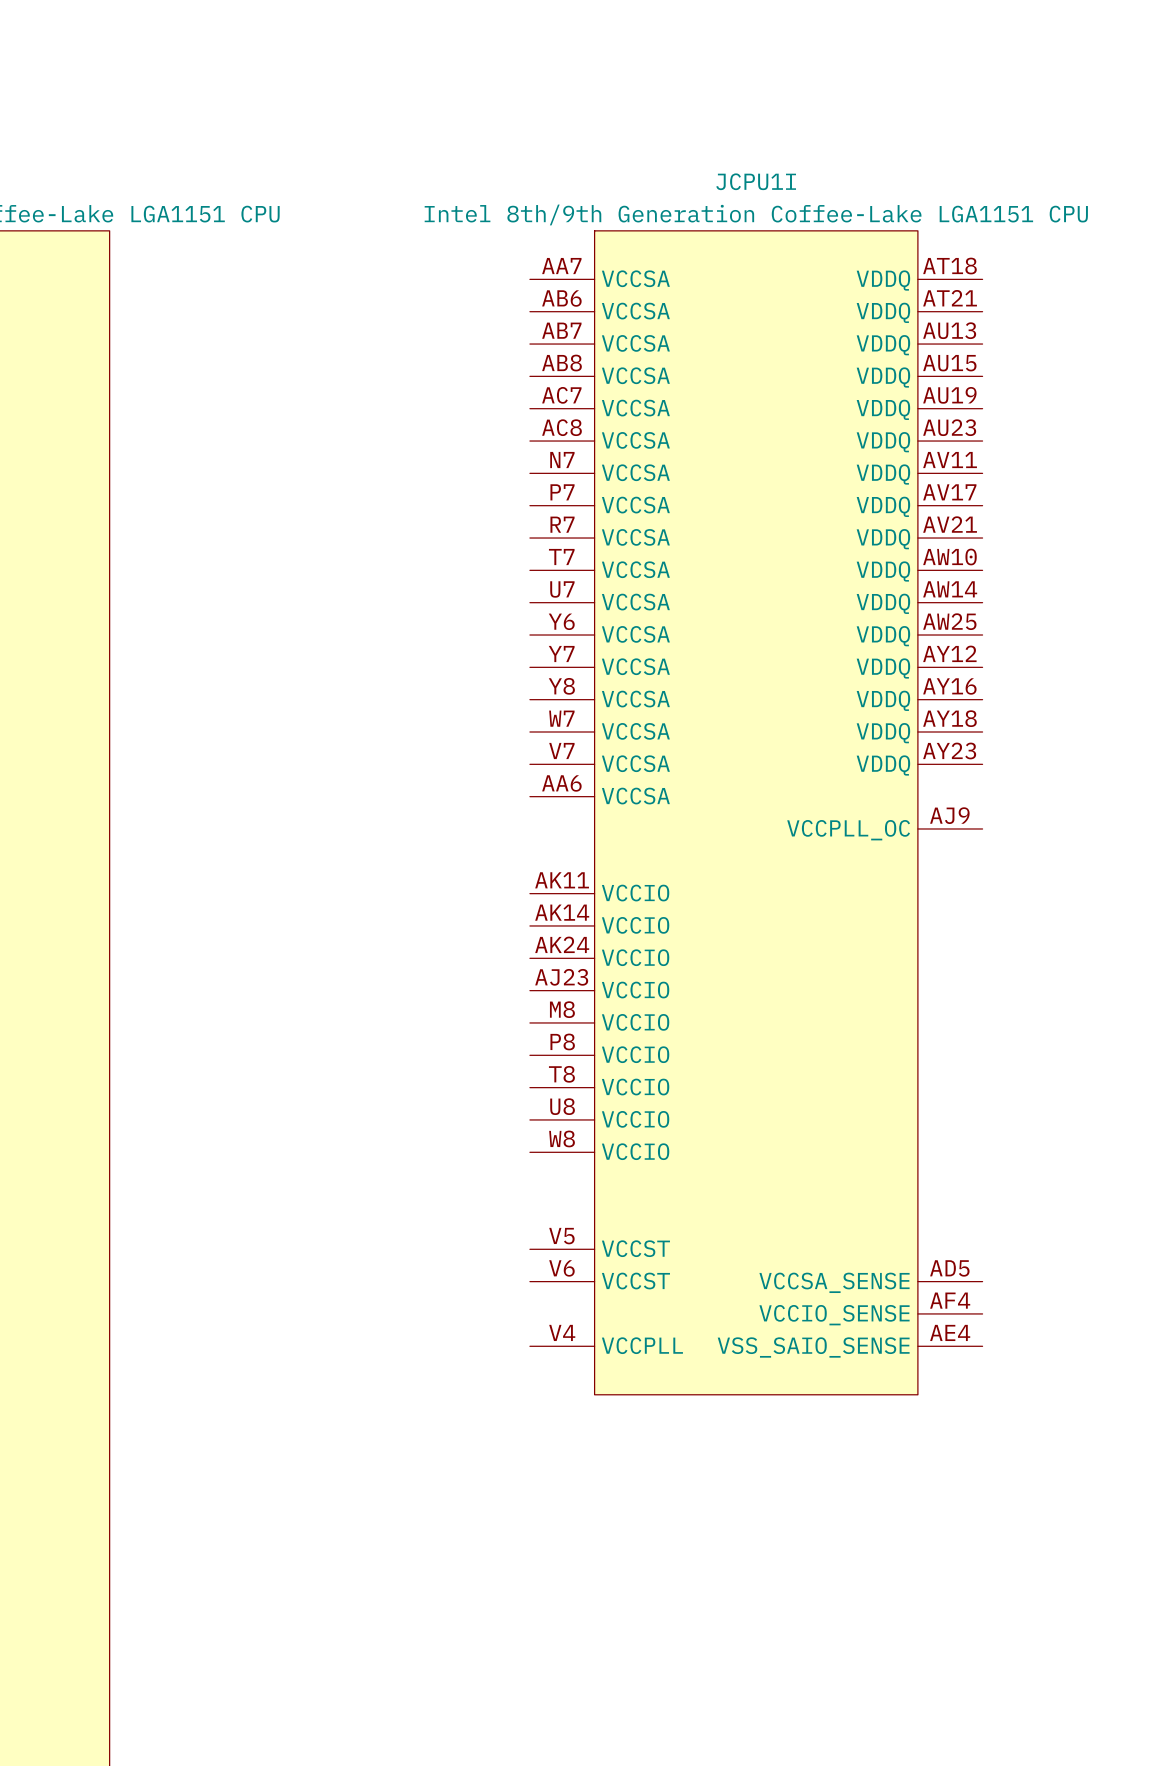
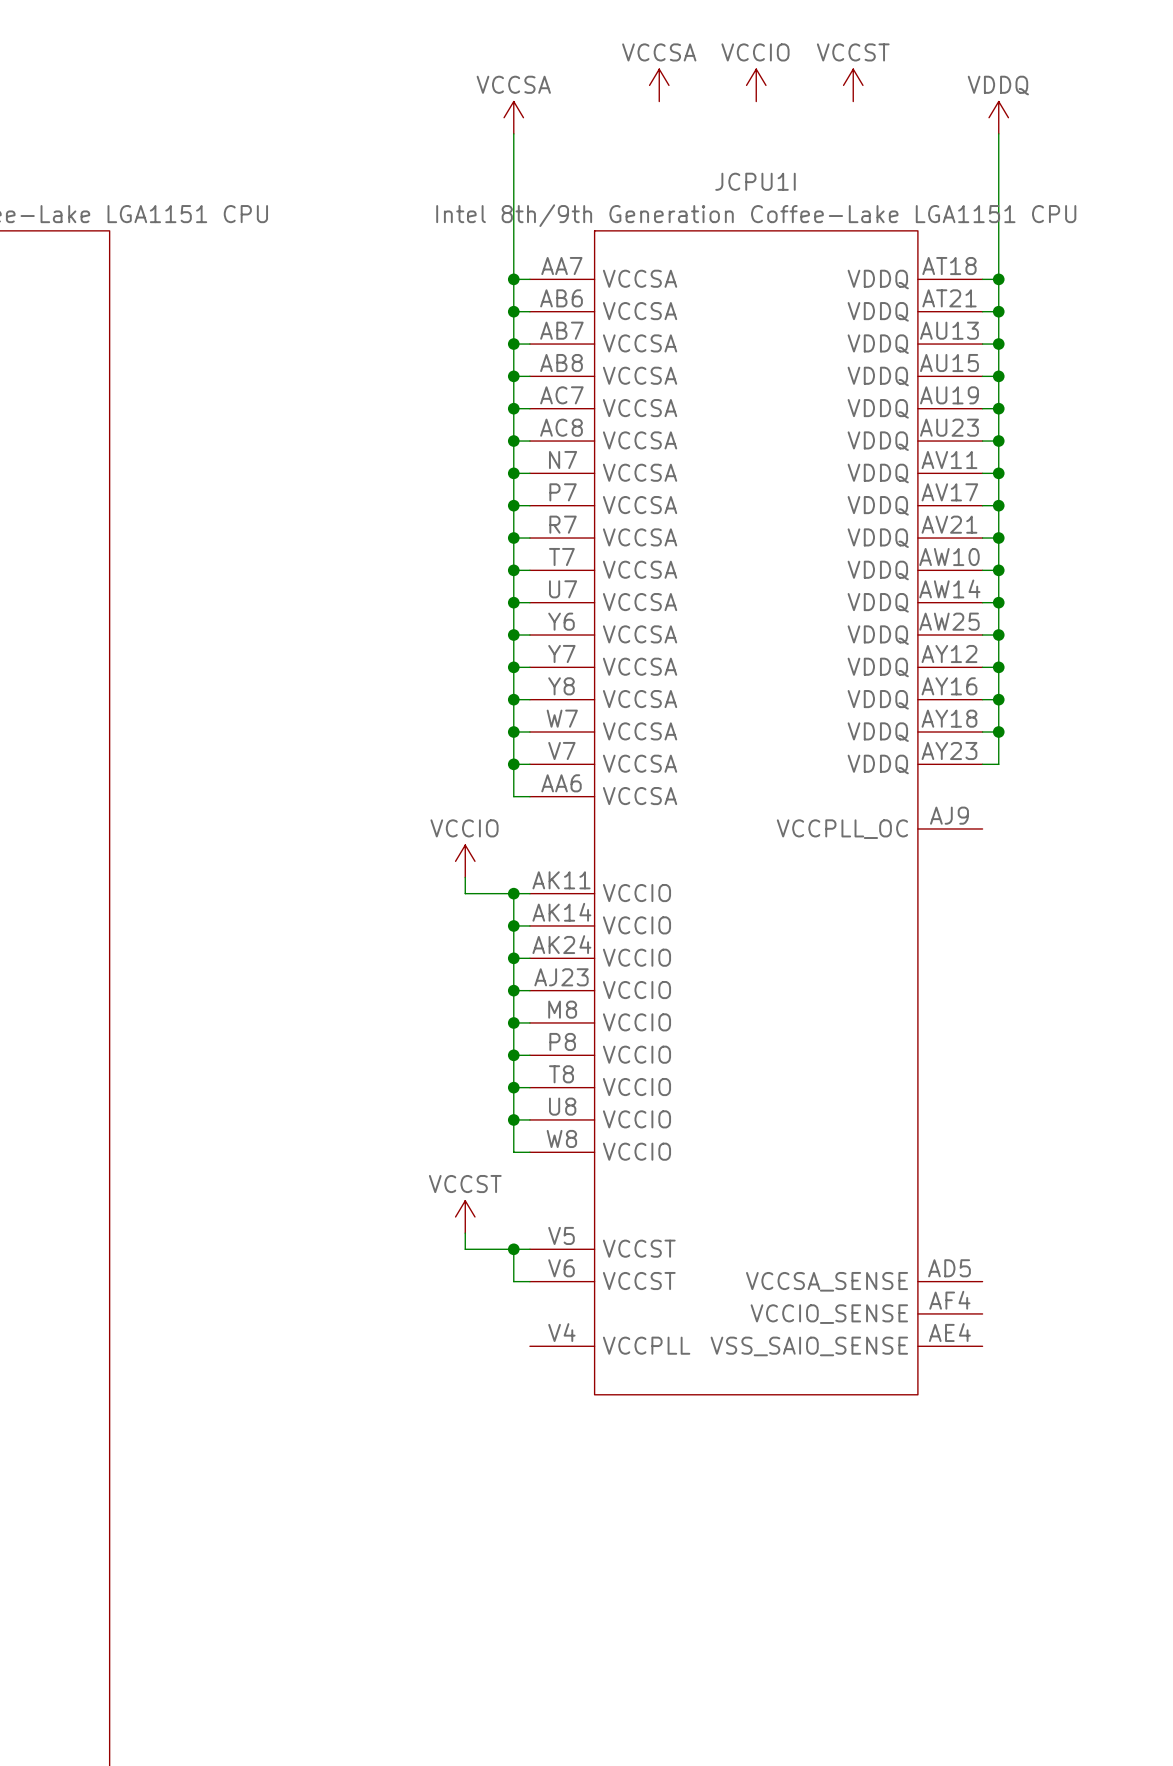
power symbol: none -> VCCSA (659, 85)
power symbol: none -> VCCIO (756, 85)
power symbol: none -> VCCST (853, 85)
power symbol: none -> VCCSA (513, 117)
power symbol: none -> VDDQ (998, 117)
wire: none -> (513, 133) (513, 796) (529, 796)
wire: none -> (998, 133) (998, 764) (982, 764)
wire: none -> (513, 279) (529, 279)
junction: none -> (513, 279)
wire: none -> (982, 279) (998, 279)
junction: none -> (998, 279)
wire: none -> (513, 311) (529, 311)
junction: none -> (513, 311)
wire: none -> (982, 311) (998, 311)
junction: none -> (998, 311)
wire: none -> (513, 344) (529, 344)
junction: none -> (513, 344)
wire: none -> (982, 344) (998, 344)
junction: none -> (998, 344)
wire: none -> (513, 376) (529, 376)
junction: none -> (513, 376)
wire: none -> (982, 376) (998, 376)
junction: none -> (998, 376)
wire: none -> (513, 408) (529, 408)
junction: none -> (513, 408)
wire: none -> (982, 408) (998, 408)
junction: none -> (998, 408)
wire: none -> (513, 441) (529, 441)
junction: none -> (513, 441)
wire: none -> (982, 441) (998, 441)
junction: none -> (998, 441)
wire: none -> (513, 473) (529, 473)
junction: none -> (513, 473)
wire: none -> (982, 473) (998, 473)
junction: none -> (998, 473)
wire: none -> (513, 505) (529, 505)
junction: none -> (513, 505)
wire: none -> (982, 505) (998, 505)
junction: none -> (998, 505)
wire: none -> (513, 538) (529, 538)
junction: none -> (513, 538)
wire: none -> (982, 538) (998, 538)
junction: none -> (998, 538)
wire: none -> (513, 570) (529, 570)
junction: none -> (513, 570)
wire: none -> (982, 570) (998, 570)
junction: none -> (998, 570)
wire: none -> (513, 602) (529, 602)
junction: none -> (513, 602)
wire: none -> (982, 602) (998, 602)
junction: none -> (998, 602)
wire: none -> (513, 635) (529, 635)
junction: none -> (513, 635)
wire: none -> (982, 635) (998, 635)
junction: none -> (998, 635)
wire: none -> (513, 667) (529, 667)
junction: none -> (513, 667)
wire: none -> (982, 667) (998, 667)
junction: none -> (998, 667)
wire: none -> (513, 699) (529, 699)
junction: none -> (513, 699)
wire: none -> (982, 699) (998, 699)
junction: none -> (998, 699)
wire: none -> (513, 731) (529, 731)
junction: none -> (513, 731)
wire: none -> (982, 731) (998, 731)
junction: none -> (998, 731)
wire: none -> (513, 764) (529, 764)
junction: none -> (513, 764)
power symbol: none -> VCCIO (465, 861)
wire: none -> (465, 877) (465, 893) (529, 893)
wire: none -> (513, 893) (513, 1152) (529, 1152)
junction: none -> (513, 893)
wire: none -> (513, 925) (529, 925)
junction: none -> (513, 925)
wire: none -> (513, 958) (529, 958)
junction: none -> (513, 958)
wire: none -> (513, 990) (529, 990)
junction: none -> (513, 990)
wire: none -> (513, 1022) (529, 1022)
junction: none -> (513, 1022)
wire: none -> (513, 1055) (529, 1055)
junction: none -> (513, 1055)
wire: none -> (513, 1087) (529, 1087)
junction: none -> (513, 1087)
wire: none -> (513, 1119) (529, 1119)
junction: none -> (513, 1119)
power symbol: none -> VCCST (465, 1216)
wire: none -> (465, 1233) (465, 1249) (529, 1249)
wire: none -> (513, 1249) (513, 1281) (529, 1281)
junction: none -> (513, 1249)

